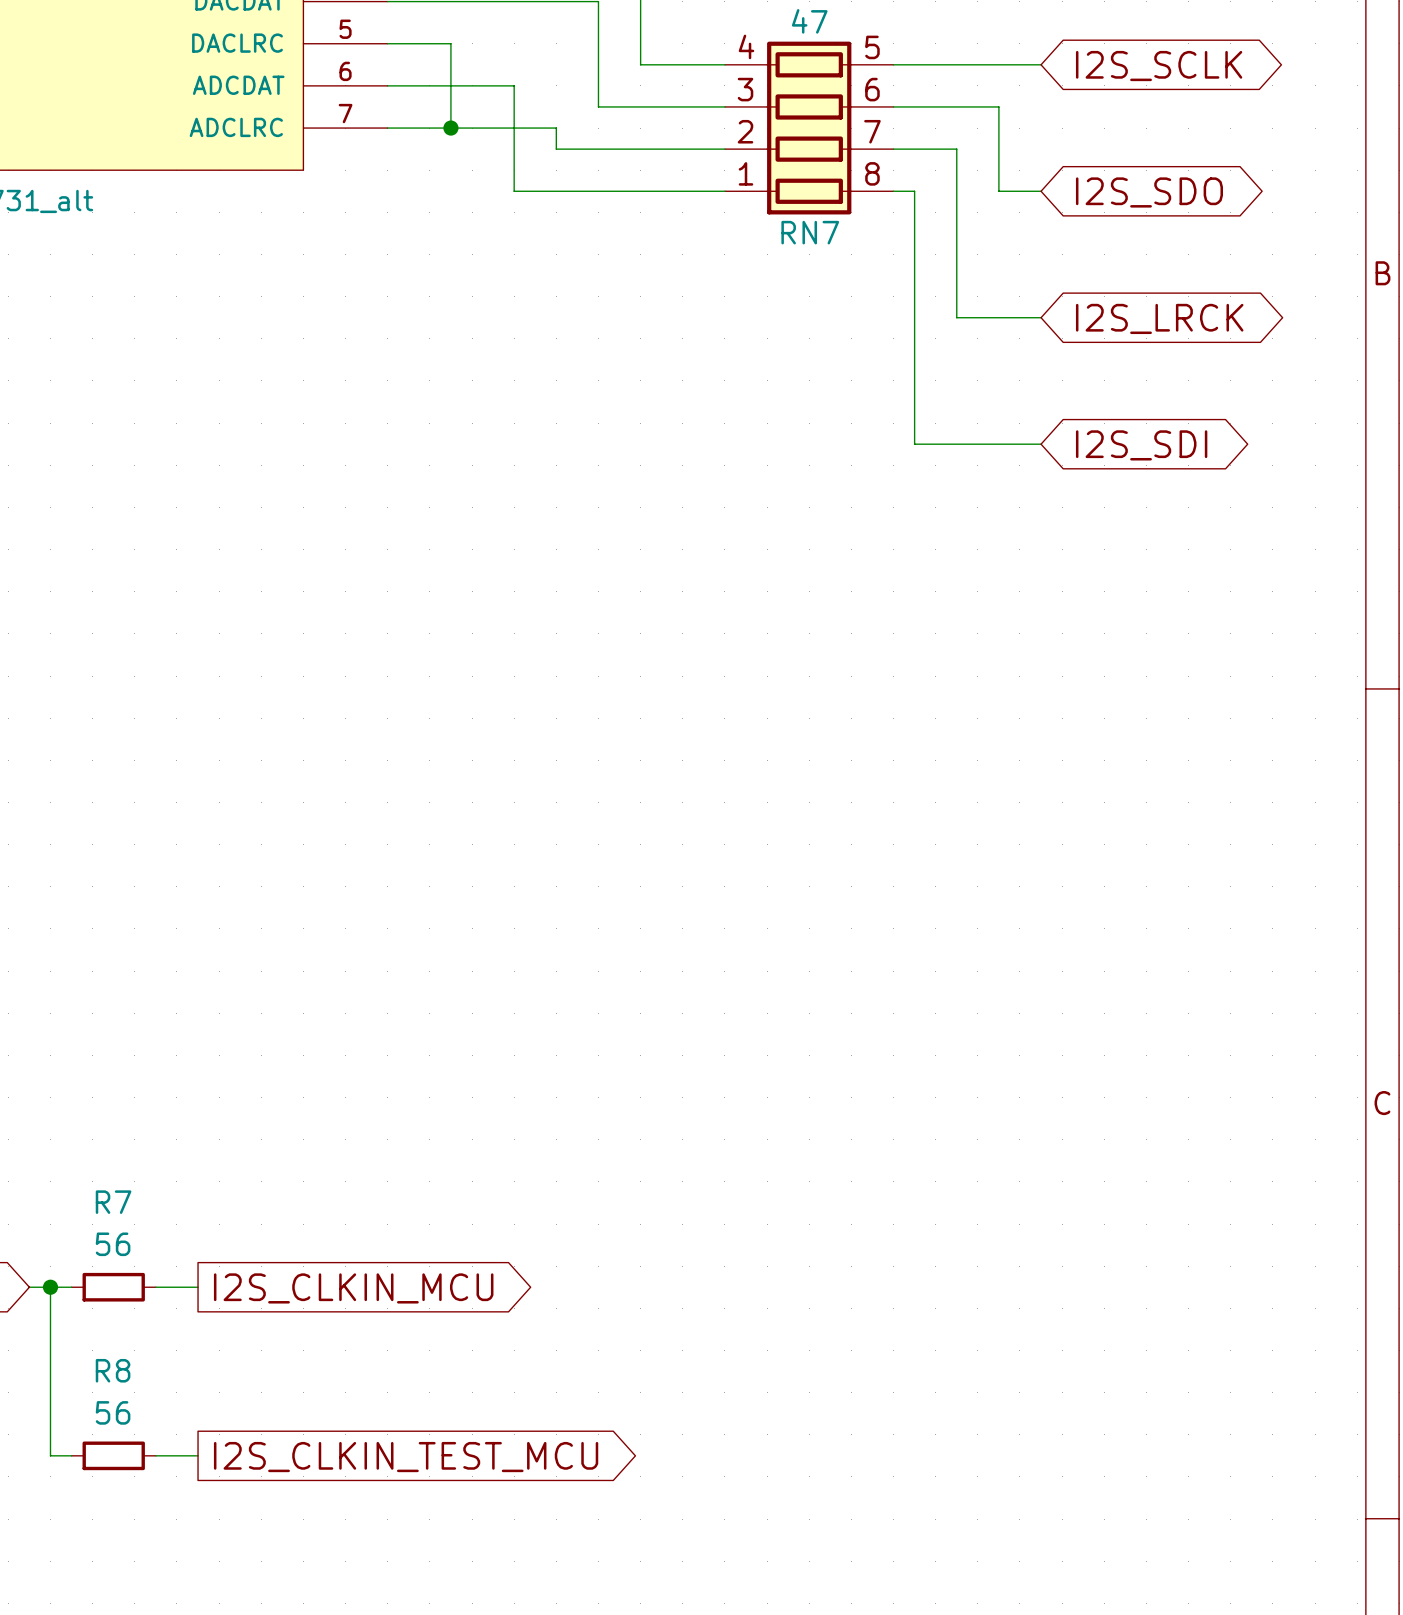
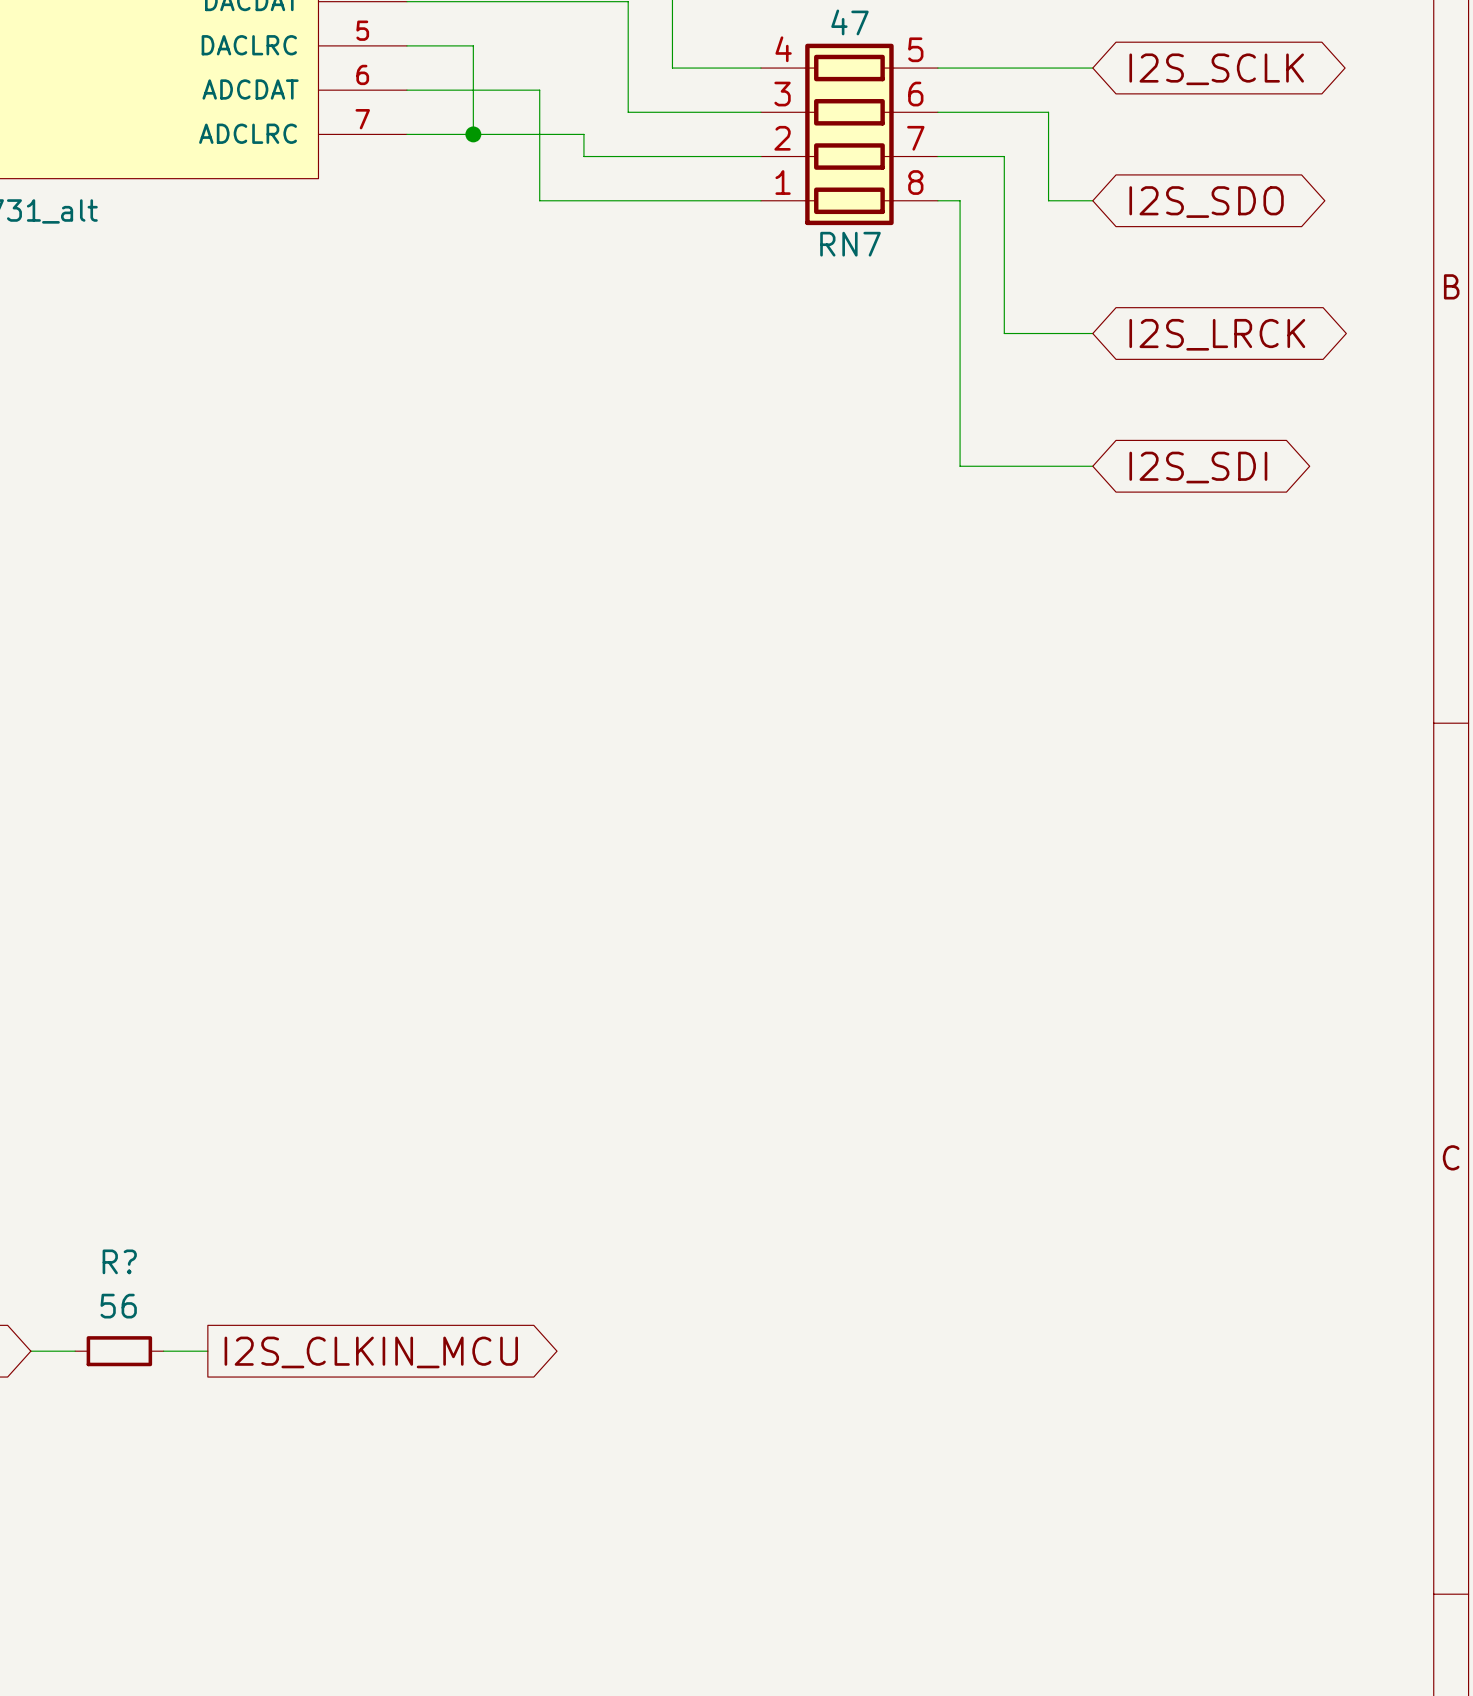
R7 name: R7 (113, 1202) -> R? (119, 1261)
wire: (50, 1287) (50, 1455) (71, 1455) -> none
junction: (50, 1287) -> none
R8: 56 (113, 1455) -> none
wire: (155, 1455) (198, 1455) -> none
global label: I2S_CLKIN_TEST_MCU (406, 1457) -> none

